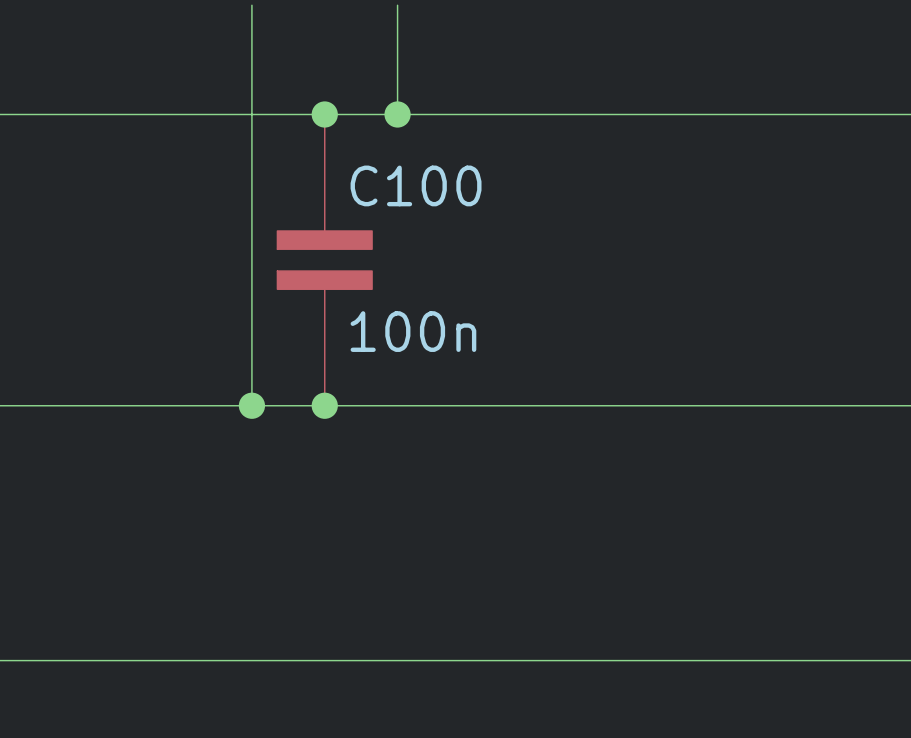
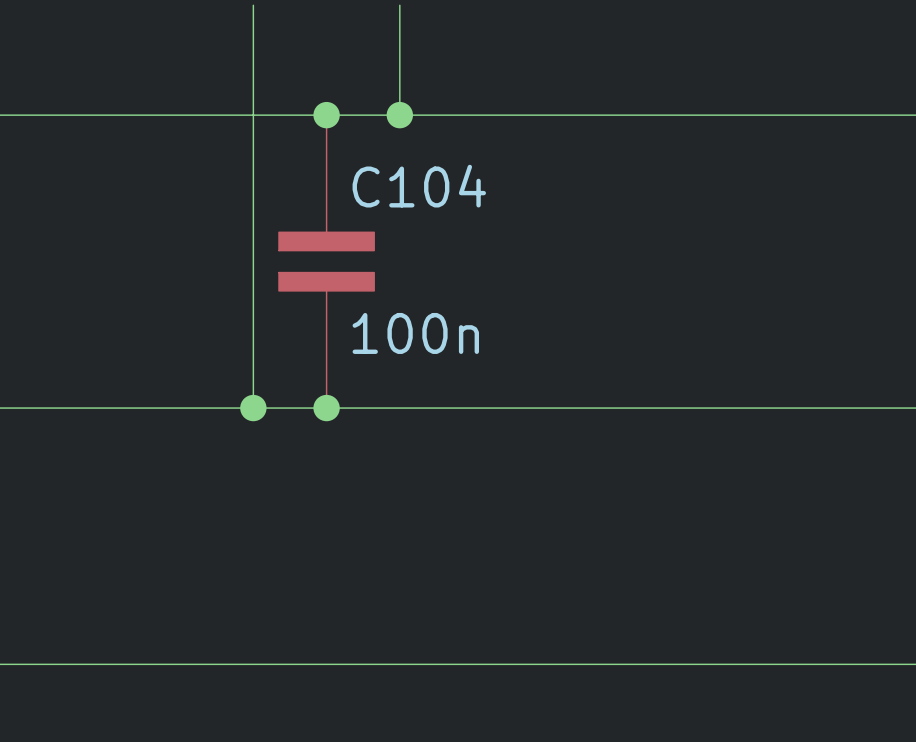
C100 name: C100 (416, 185) -> C104 (419, 186)

